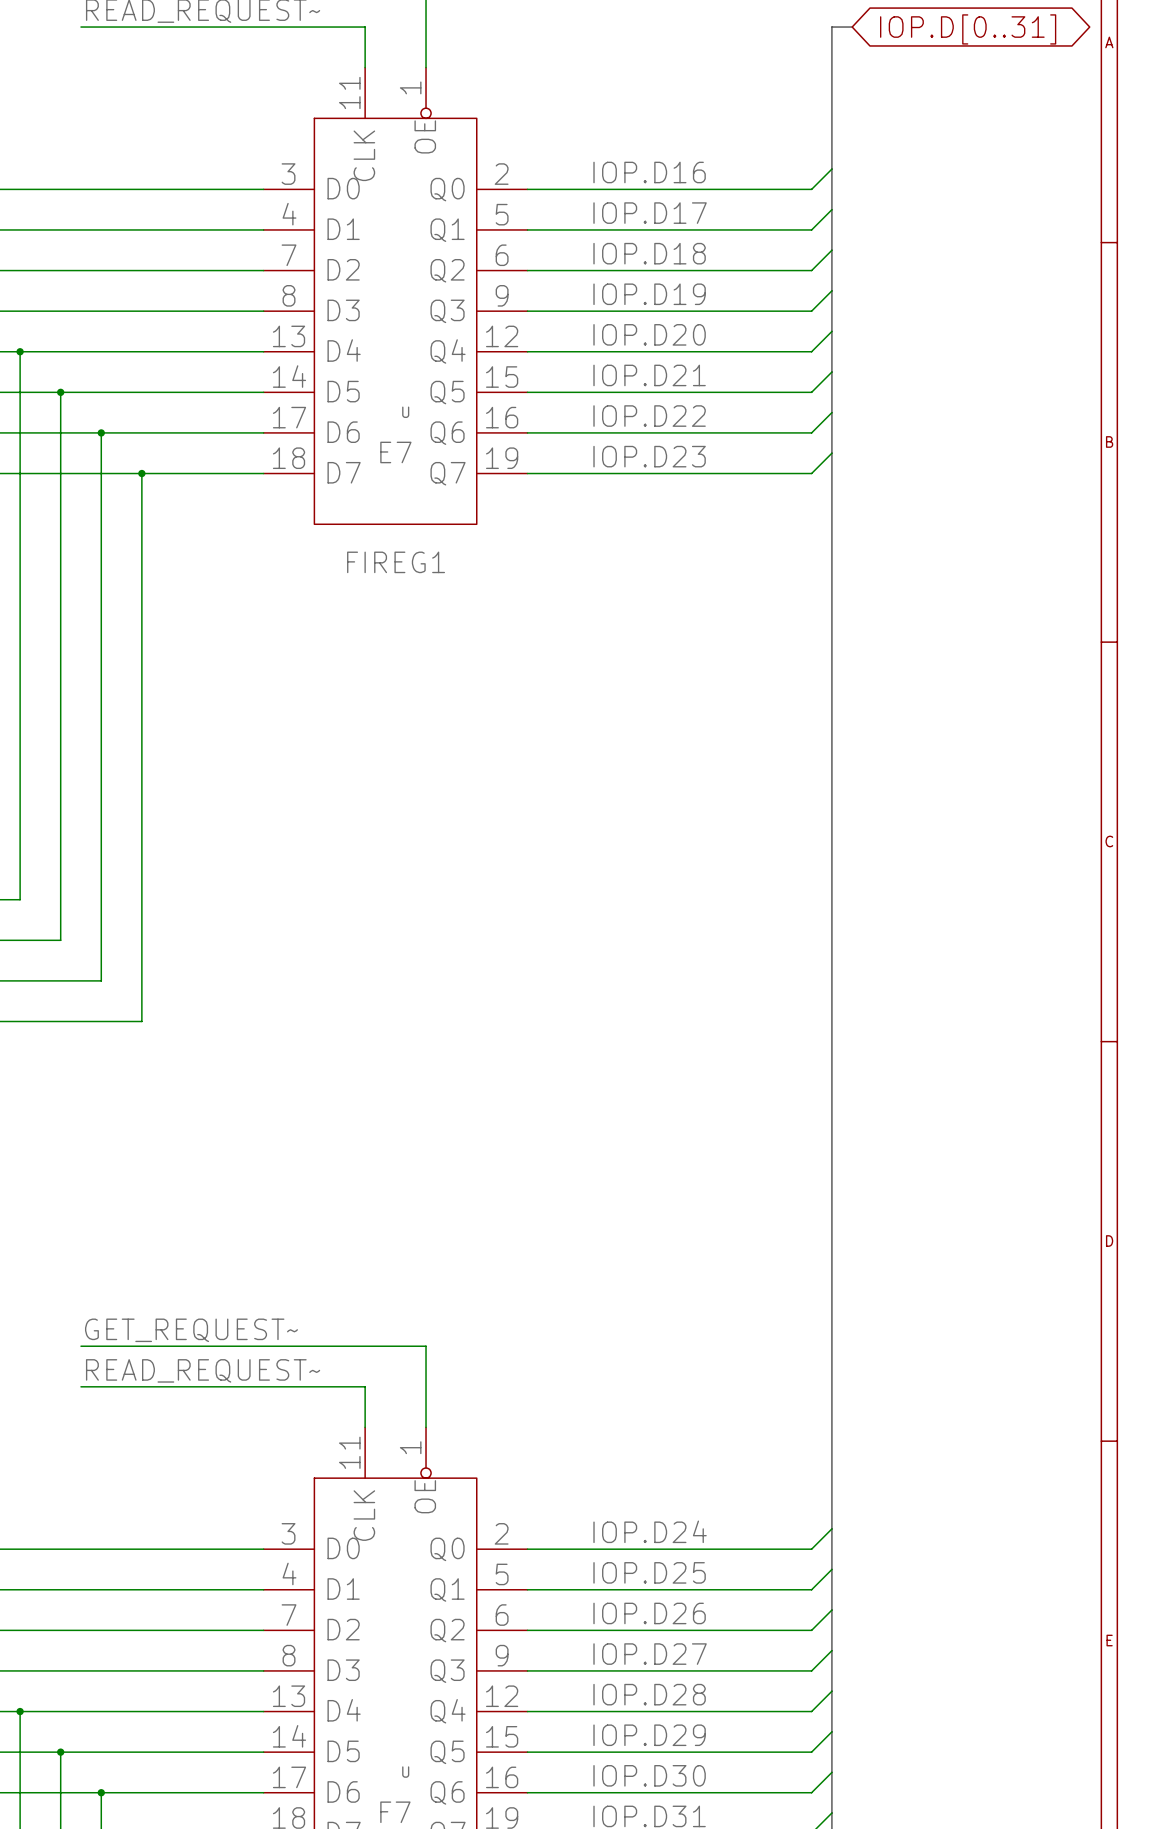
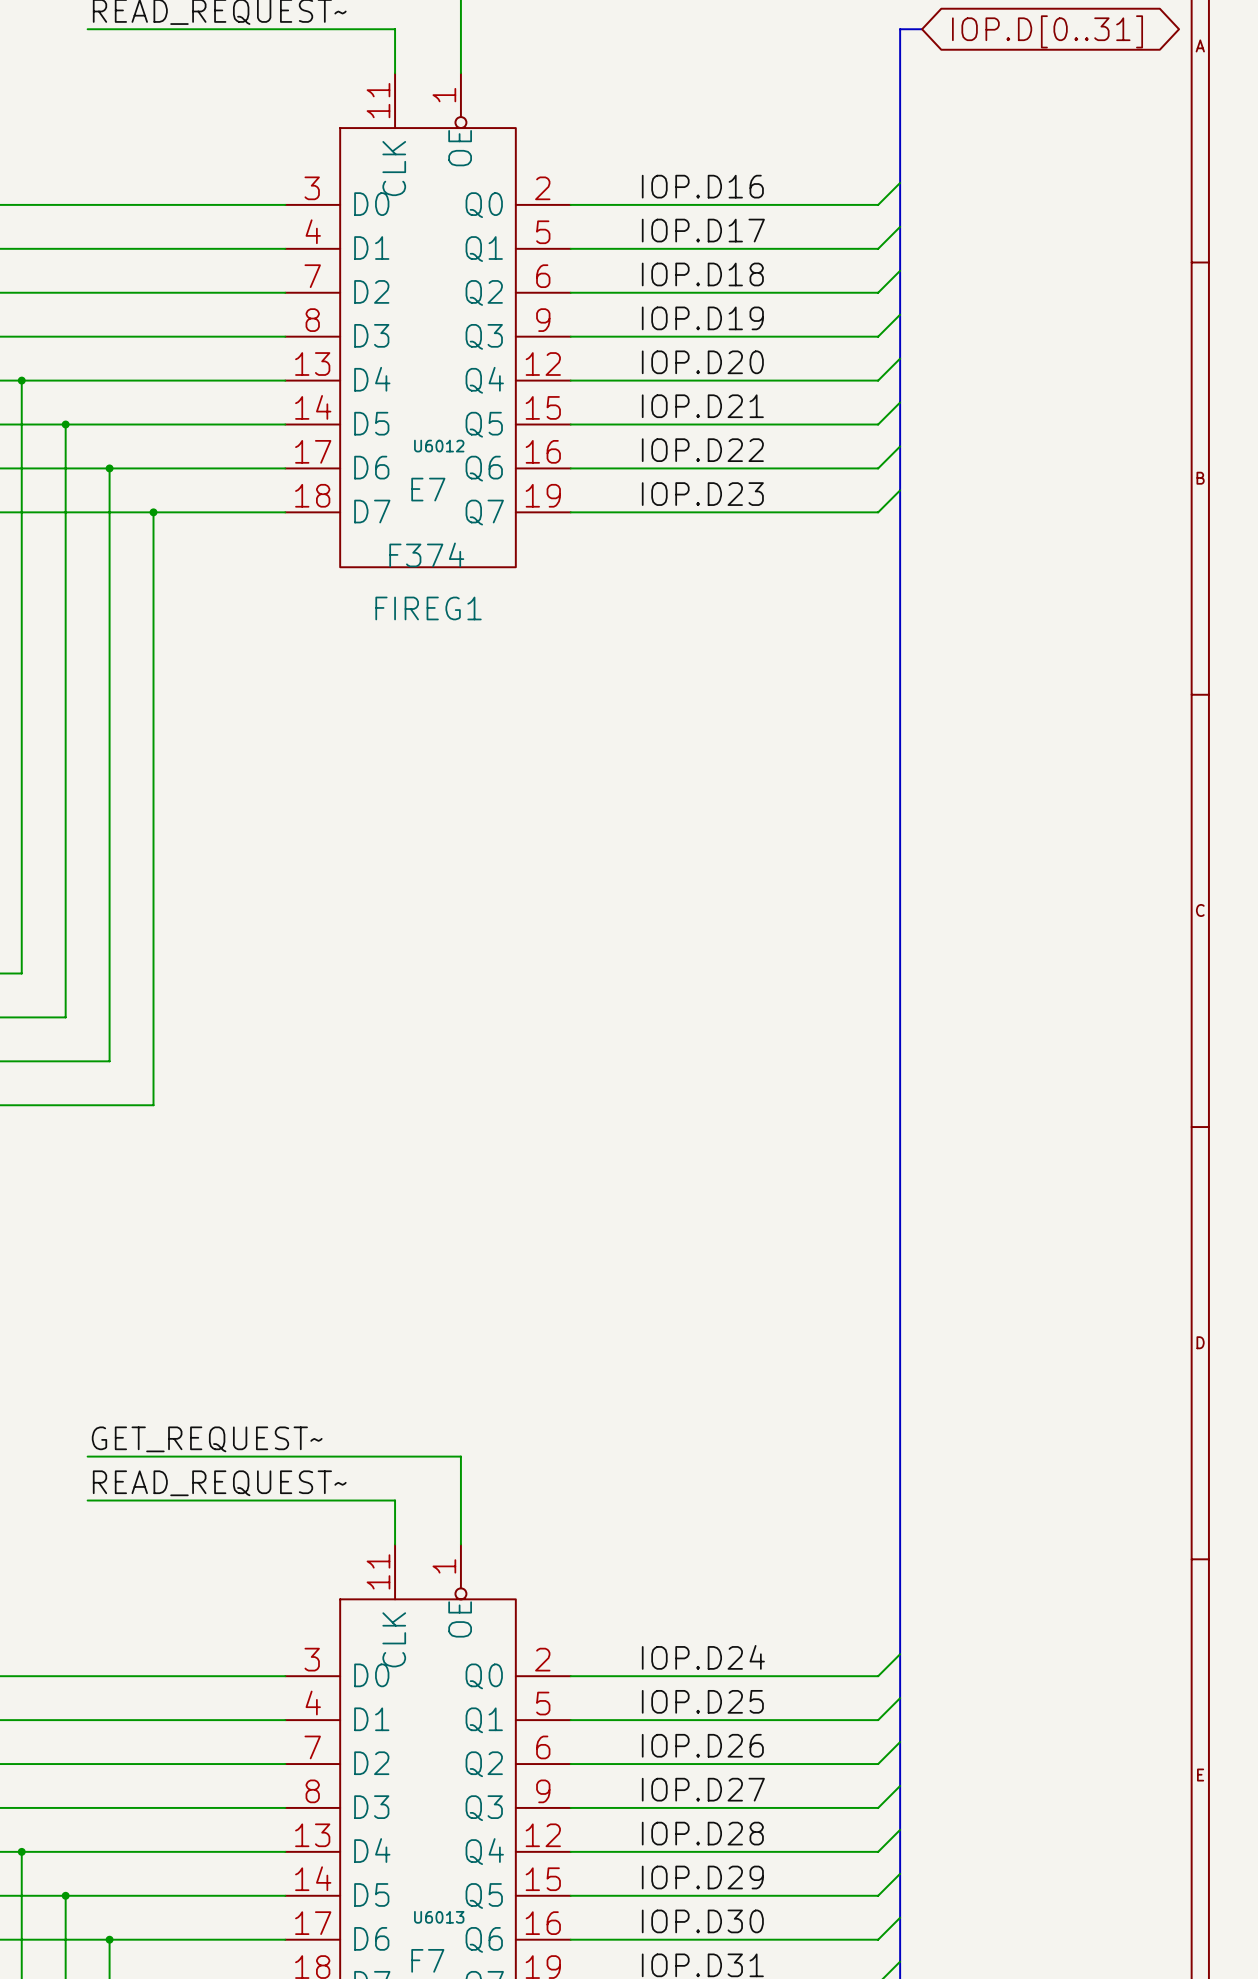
U name: U (405, 412) -> U6012 (439, 446)
U value: none -> F374 (426, 554)
U name: U (405, 1772) -> U6013 (439, 1917)

